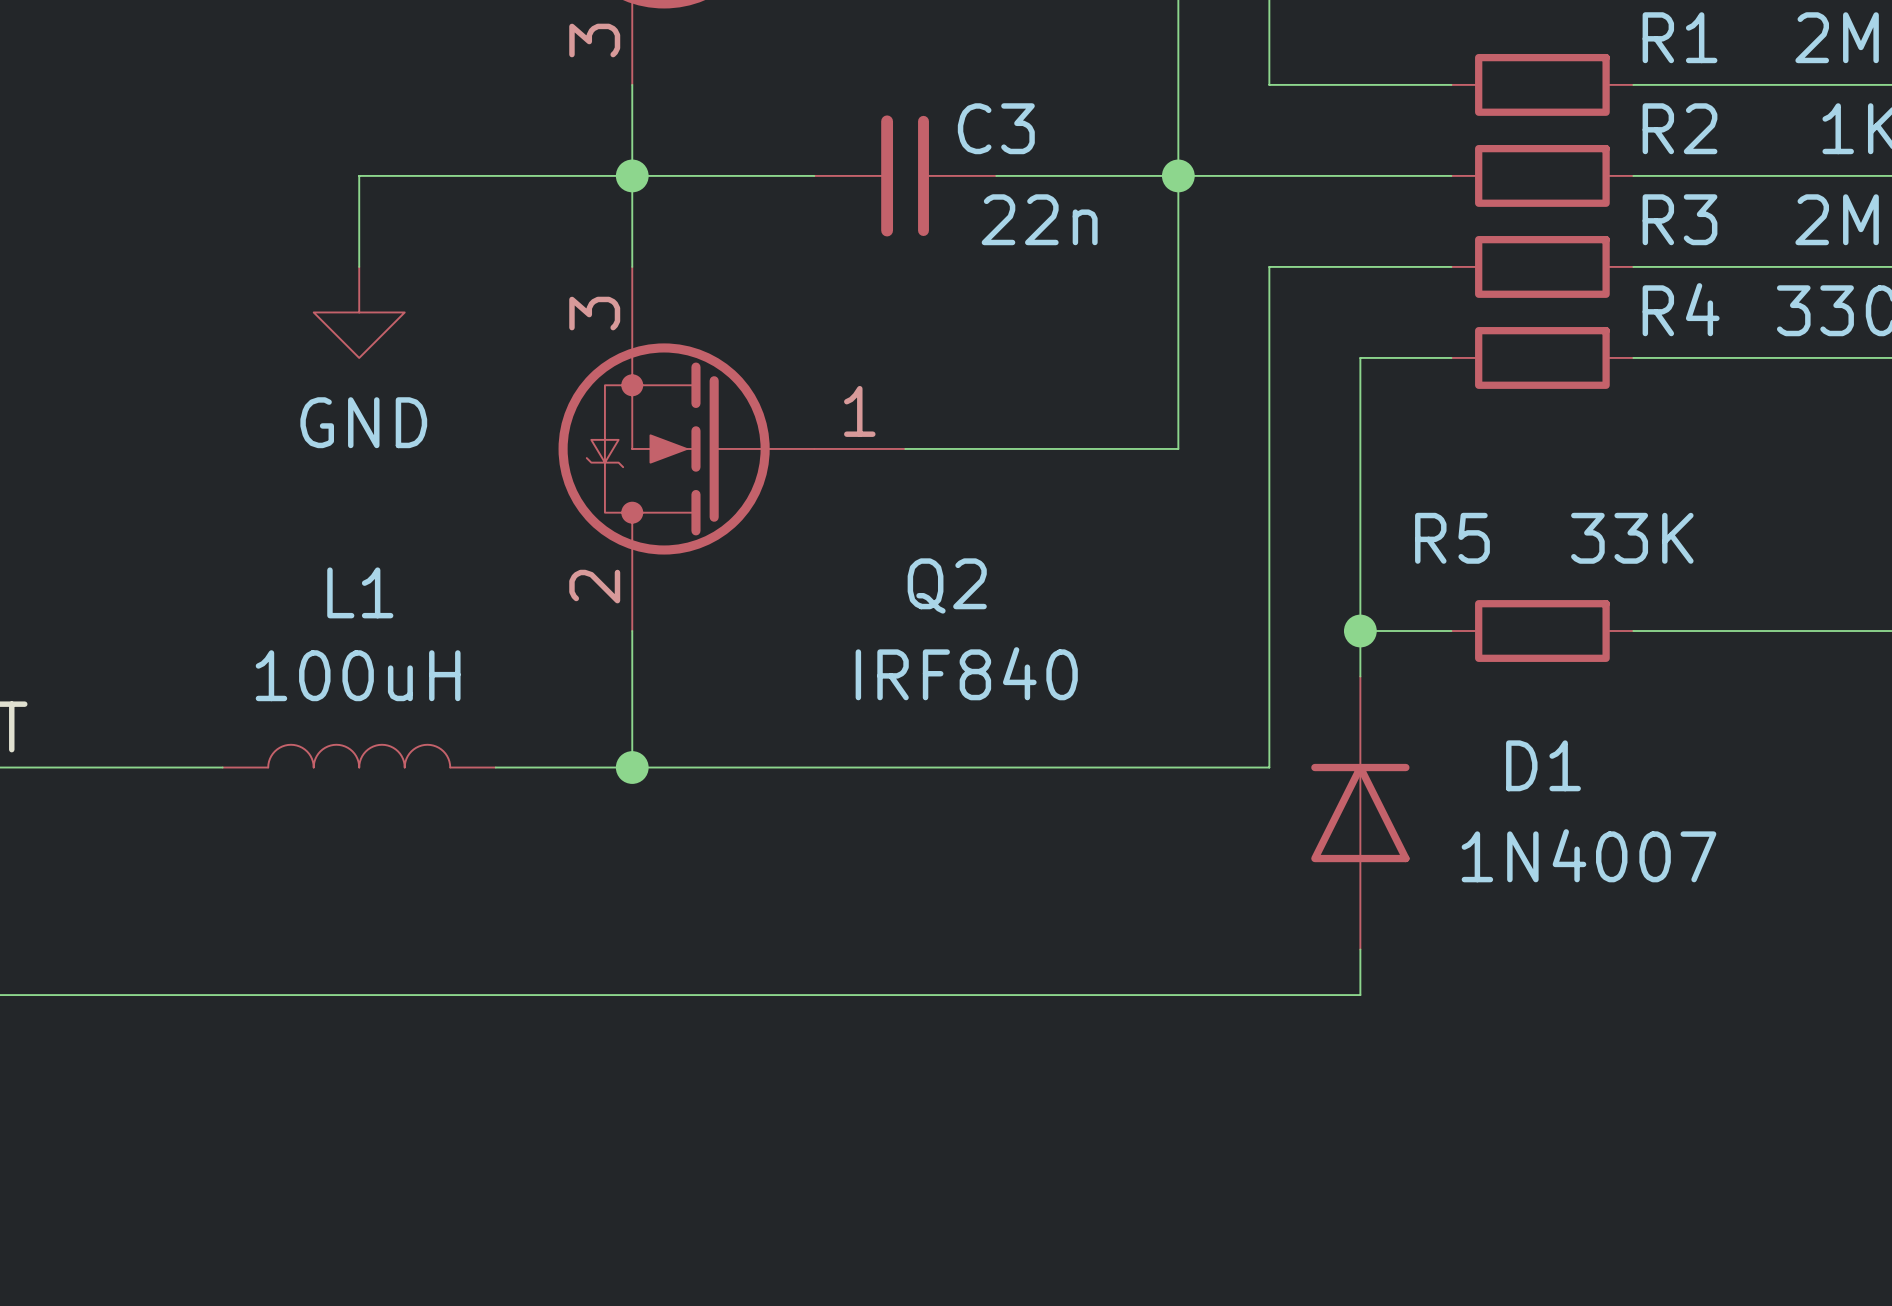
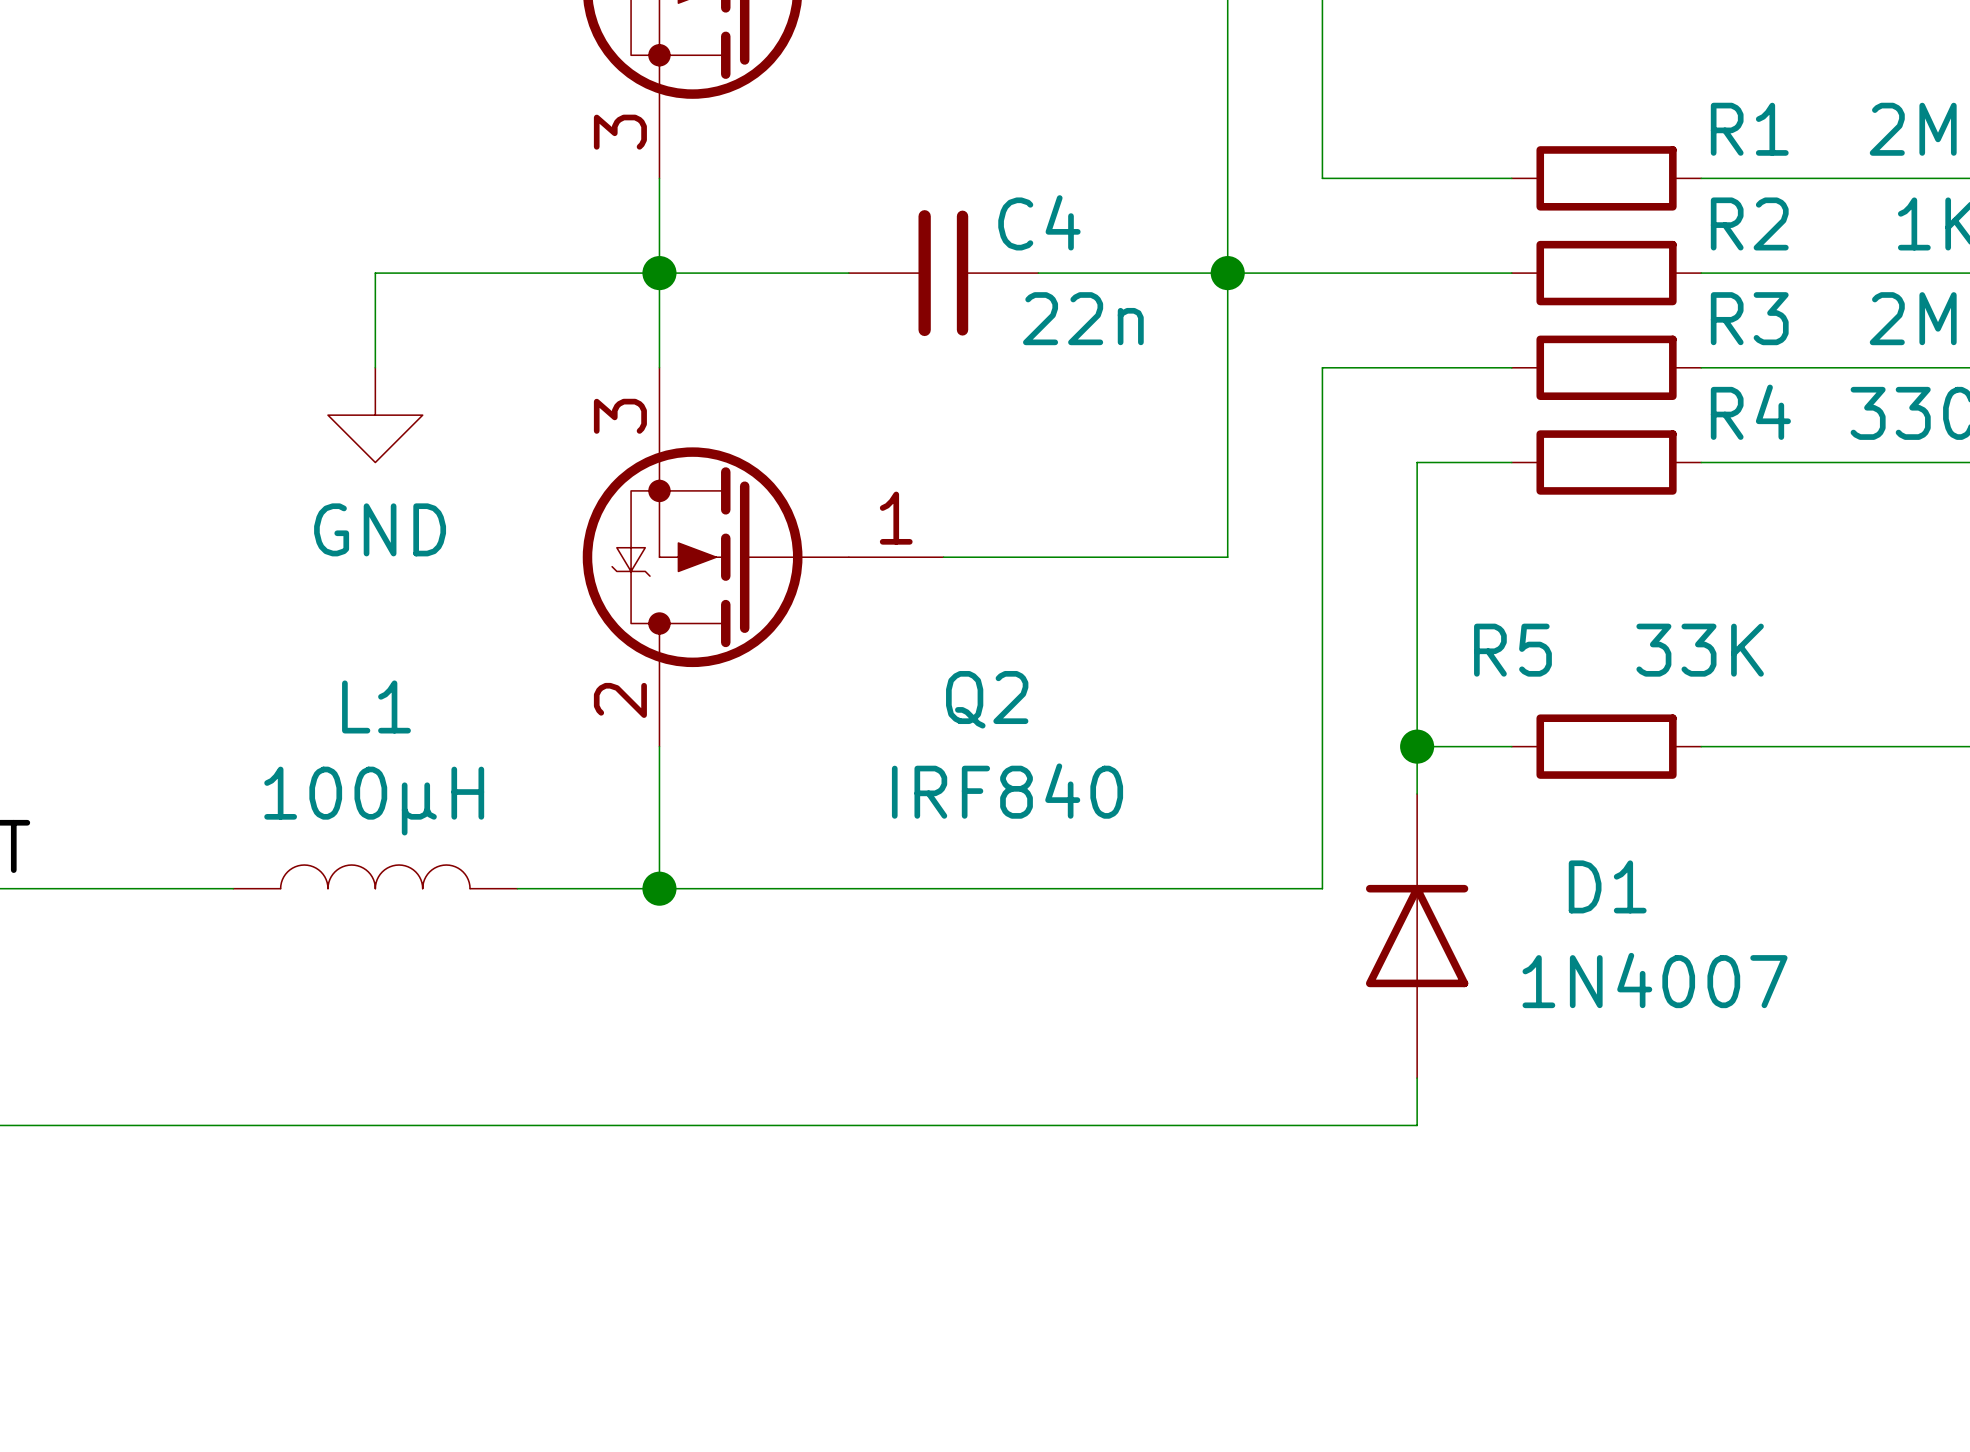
C3 name: C3 (996, 128) -> C4 (1039, 222)
L1 value: 100uH (358, 675) -> 100µH (374, 801)

